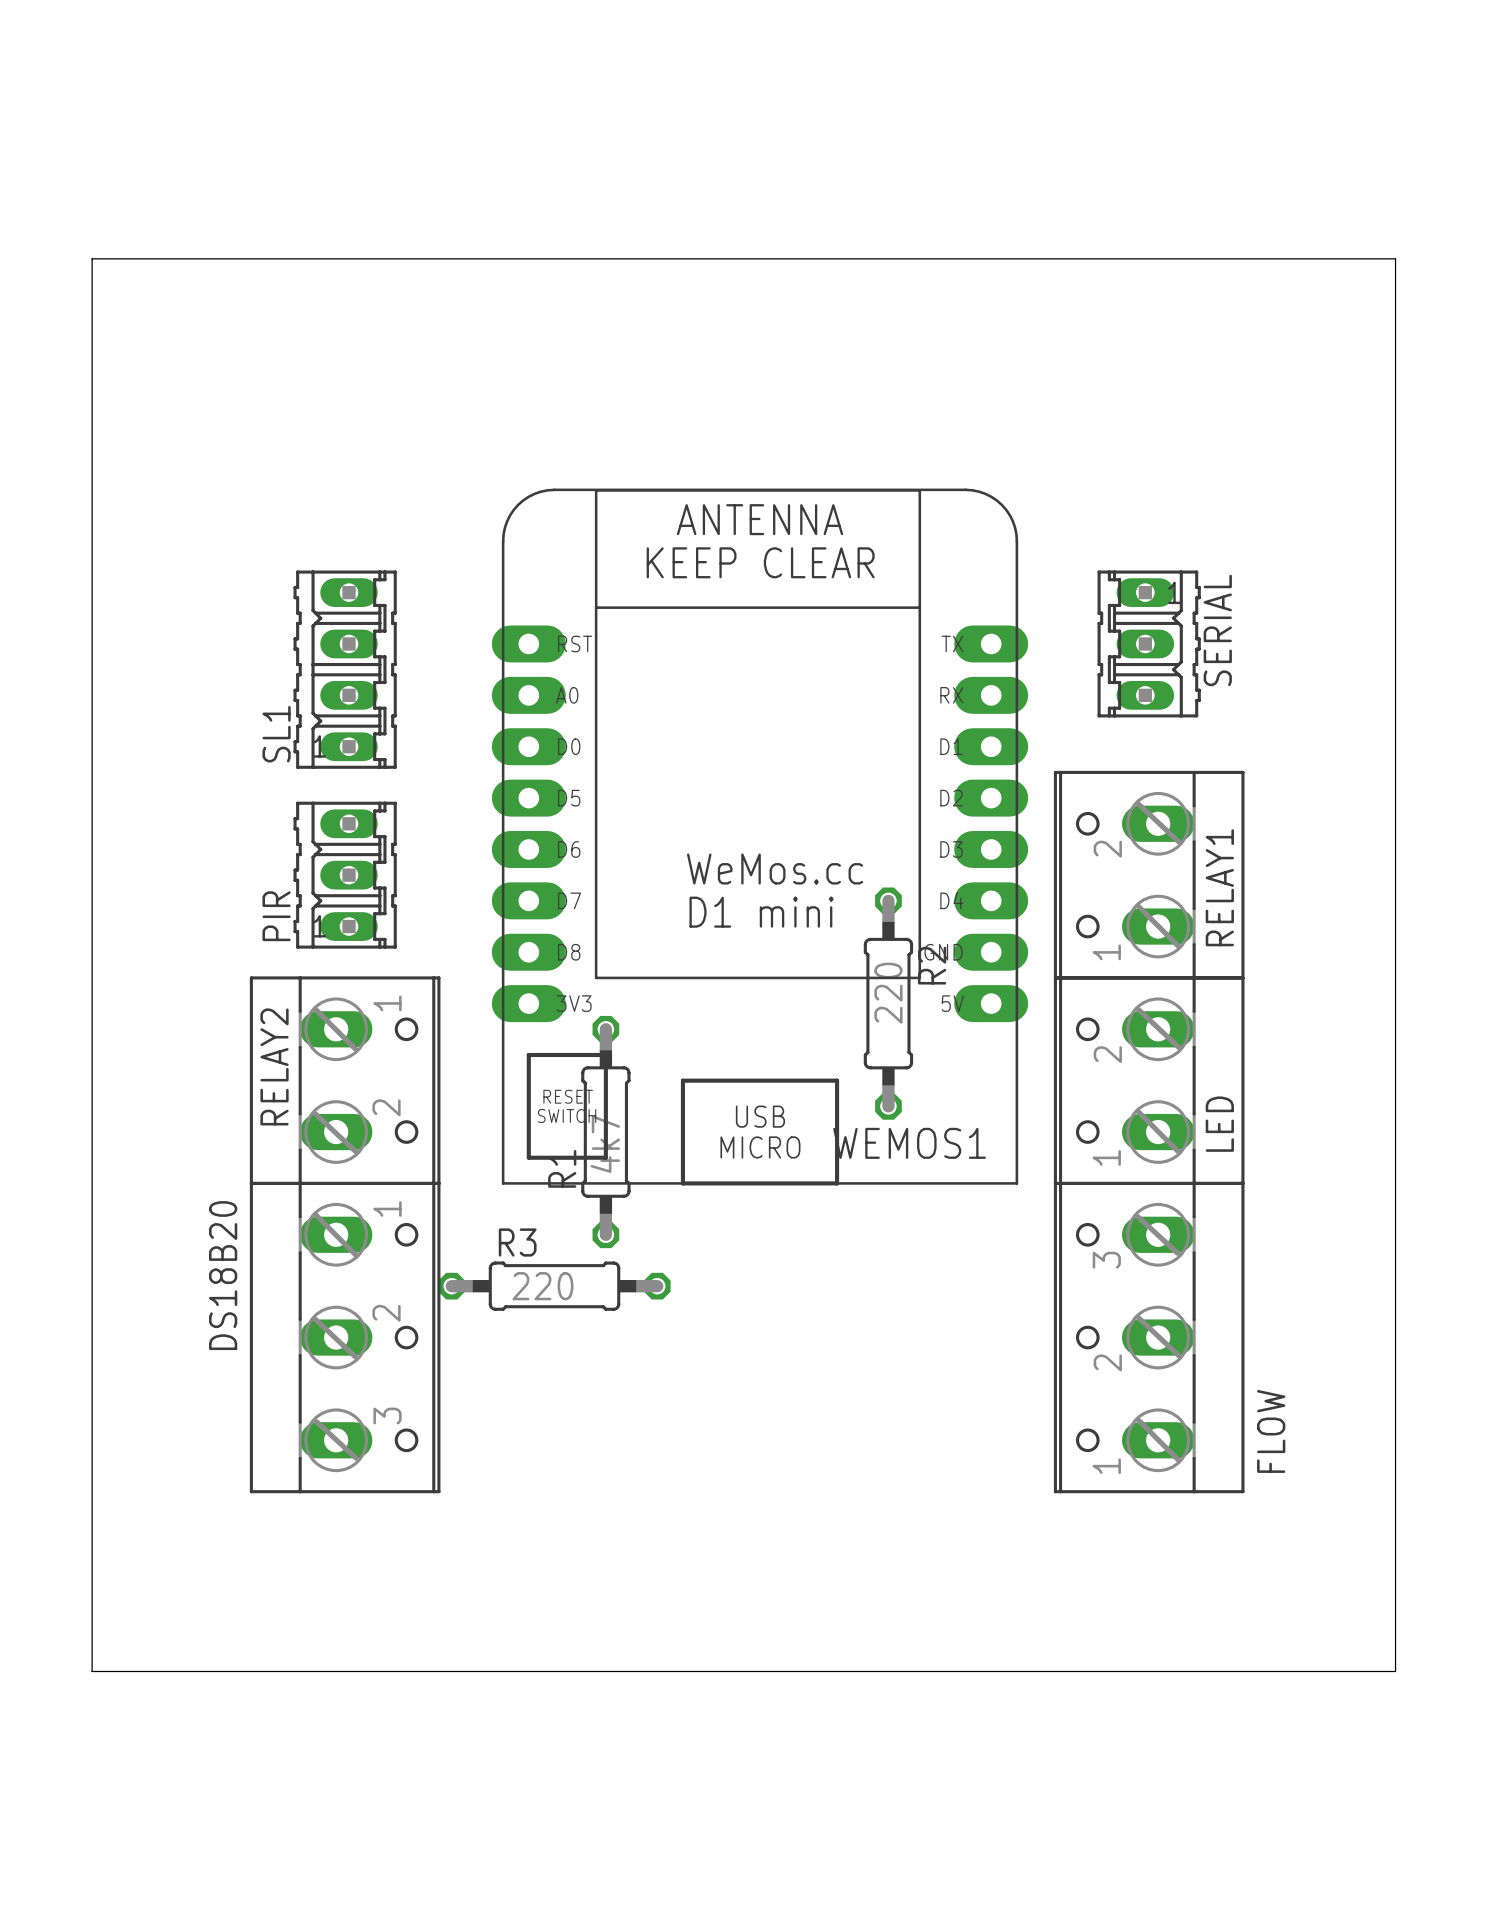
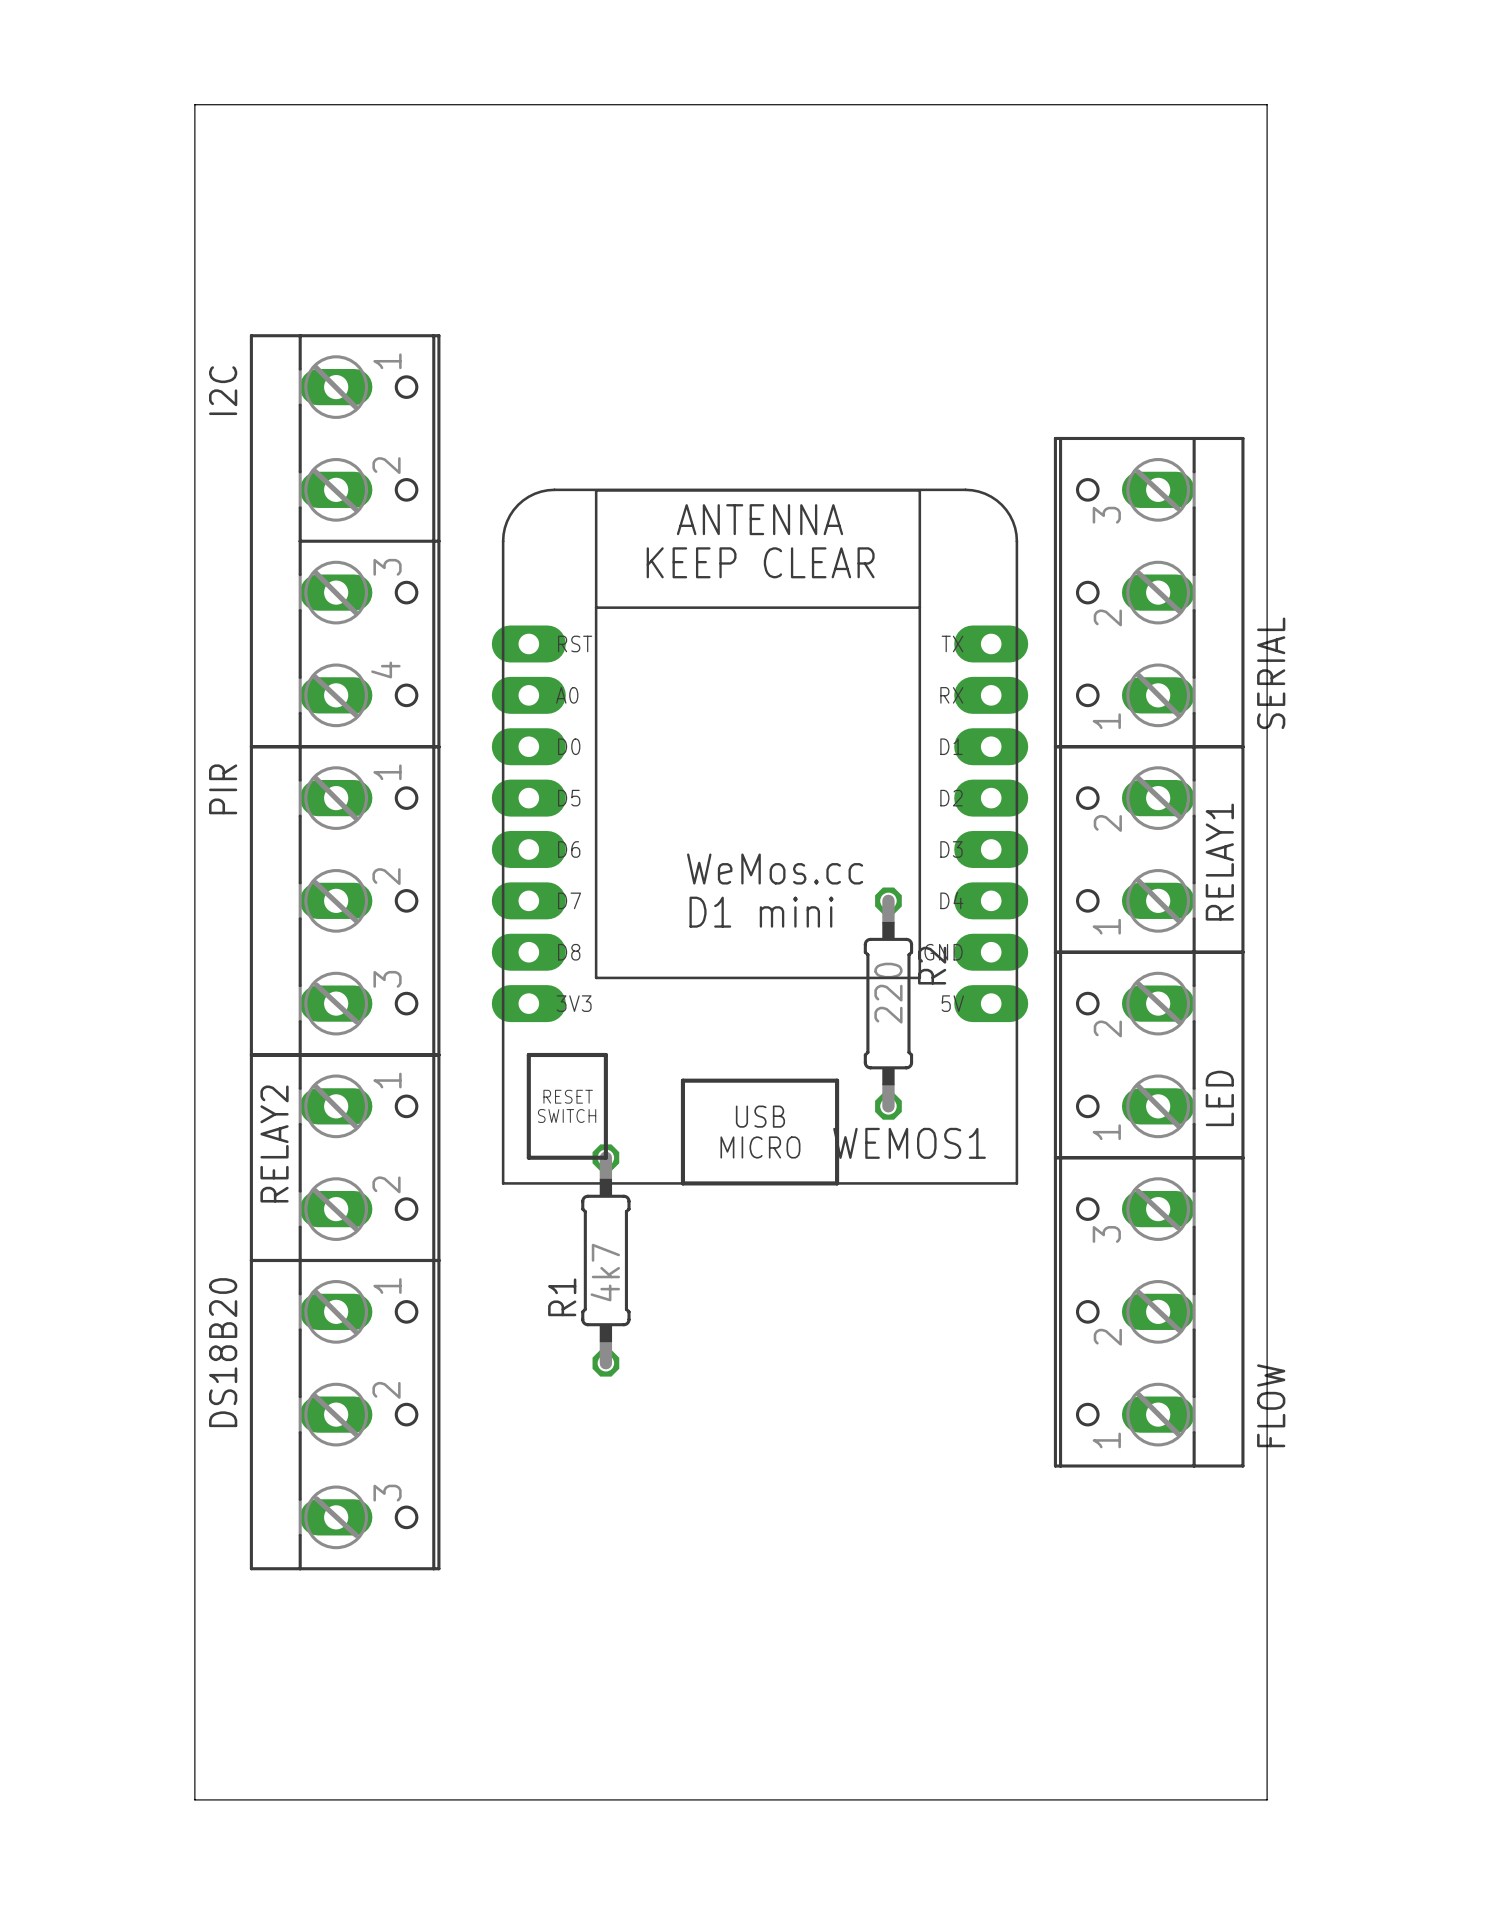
board edge: (92, 258) (1395, 258) (1395, 1671) (92, 1671) (92, 258) -> (194, 104) (194, 1799) (1267, 1799) (1267, 104) (194, 104)
I2C: none -> (345, 541)
SERIAL: none -> (1149, 592)
SERIAL: (1149, 643) -> none
SL1: (345, 669) -> none
PIR: (345, 875) -> none
RELAY1 position: (1149, 875) -> (1149, 849)
PIR: none -> (345, 900)
RELAY2 position: (345, 1080) -> (345, 1157)
LED position: (1149, 1080) -> (1149, 1054)
R1 position: (605, 1132) -> (605, 1260)
R3: 220 (554, 1286) -> none
DS18B20 position: (345, 1337) -> (345, 1414)
FLOW position: (1149, 1337) -> (1149, 1311)

